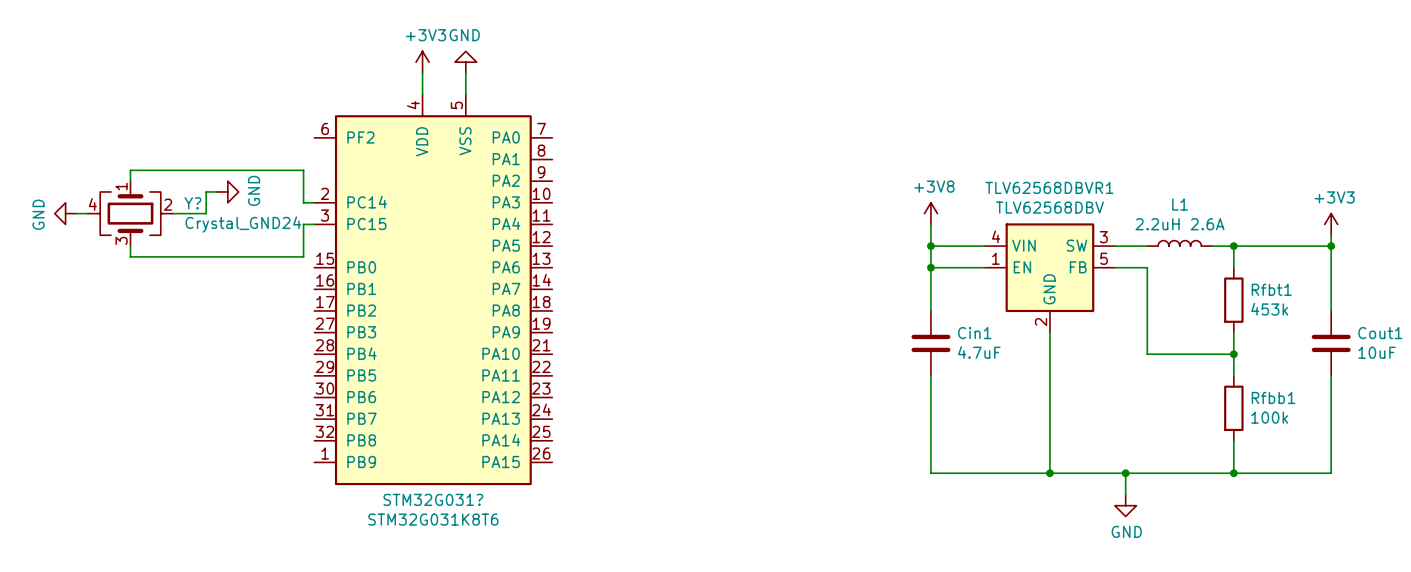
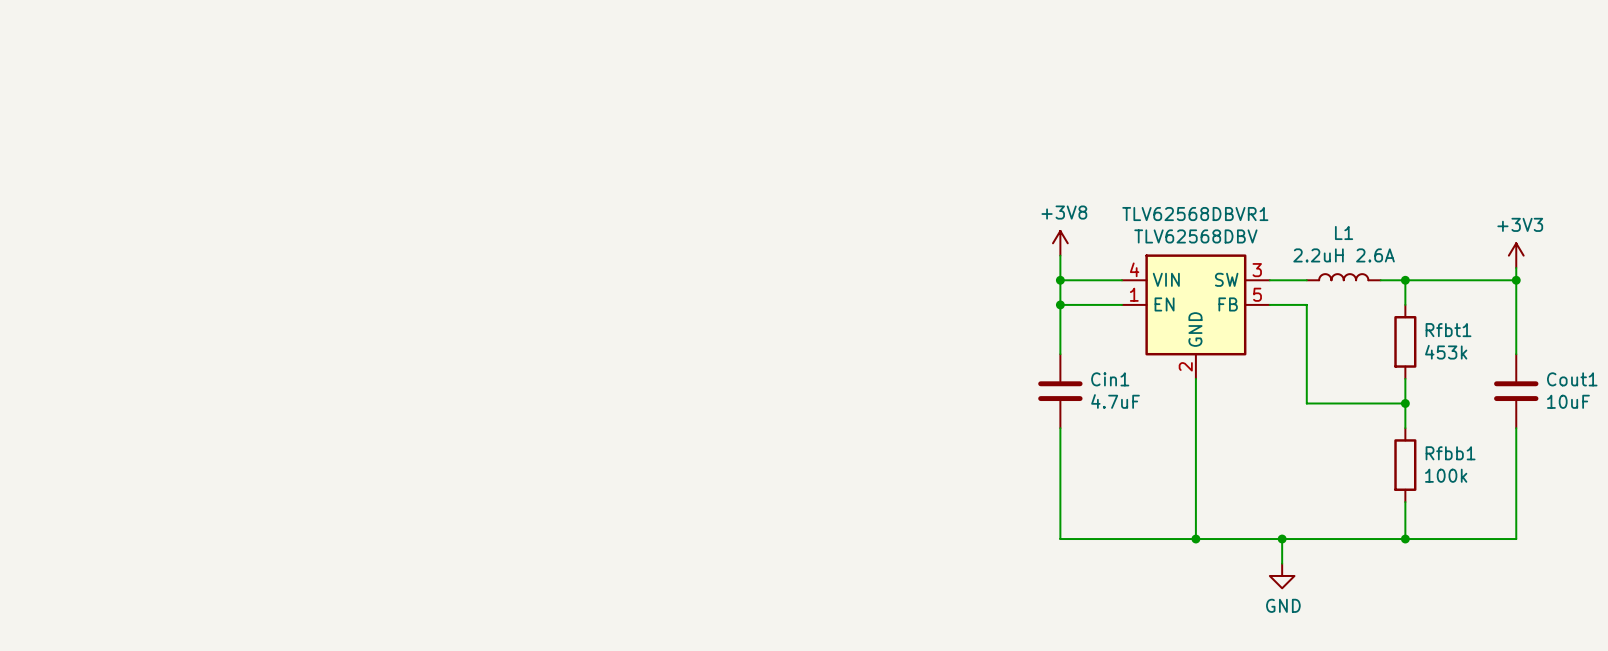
power symbol: +3V3 (422, 62) -> none
power symbol: GND (465, 62) -> none
wire: (422, 72) (422, 94) -> none
wire: (465, 72) (465, 94) -> none
wire: (130, 181) (130, 170) (303, 170) (303, 202) (314, 202) -> none
wire: (217, 191) (206, 191) (206, 213) (173, 213) -> none
power symbol: GND (227, 191) -> none
power symbol: GND (65, 213) -> none
wire: (76, 213) (87, 213) -> none
Y?: Crystal_GND24 (130, 213) -> none
wire: (314, 224) (303, 224) (303, 256) (130, 256) (130, 246) -> none
STM32G031?: STM32G031K8T6 (433, 289) -> none

